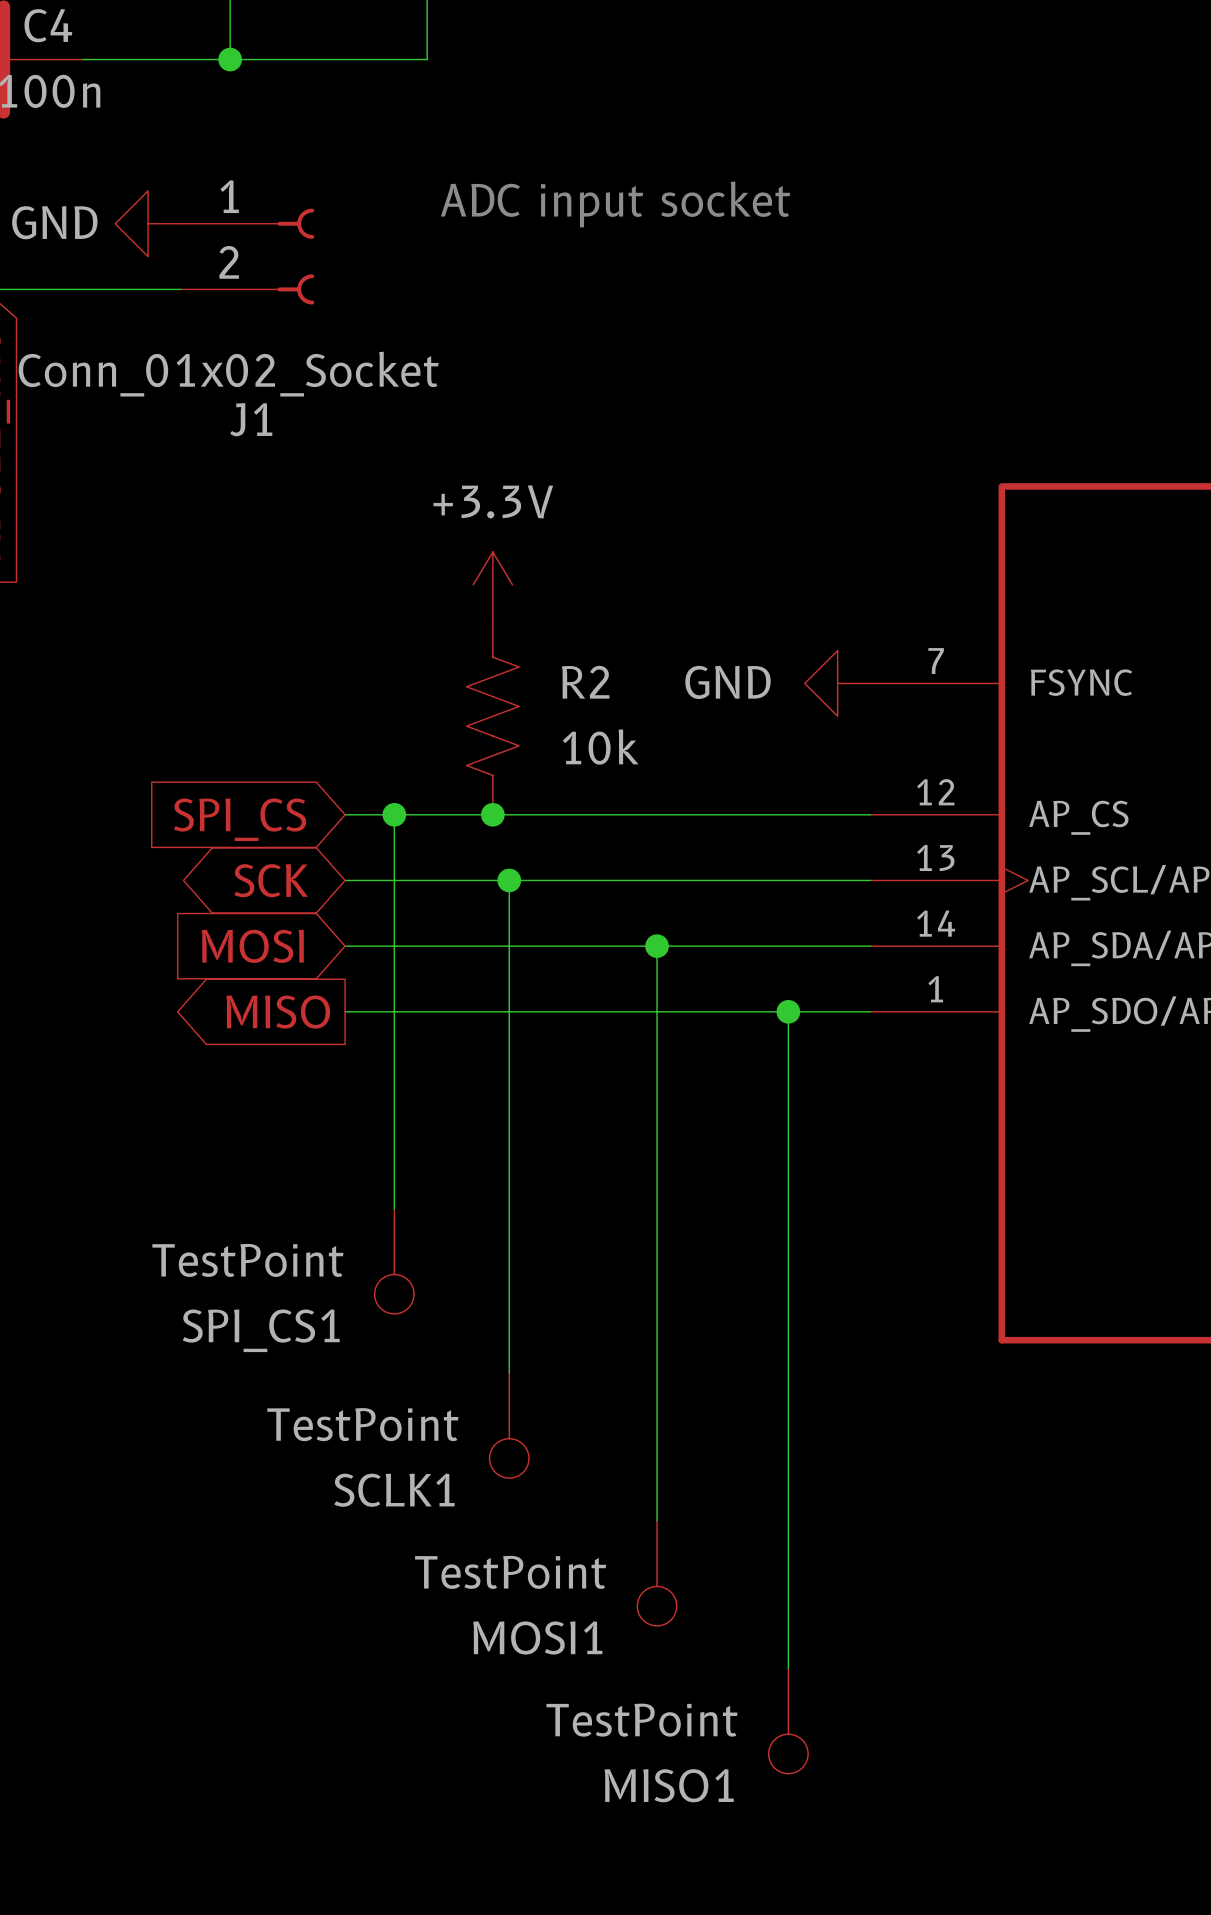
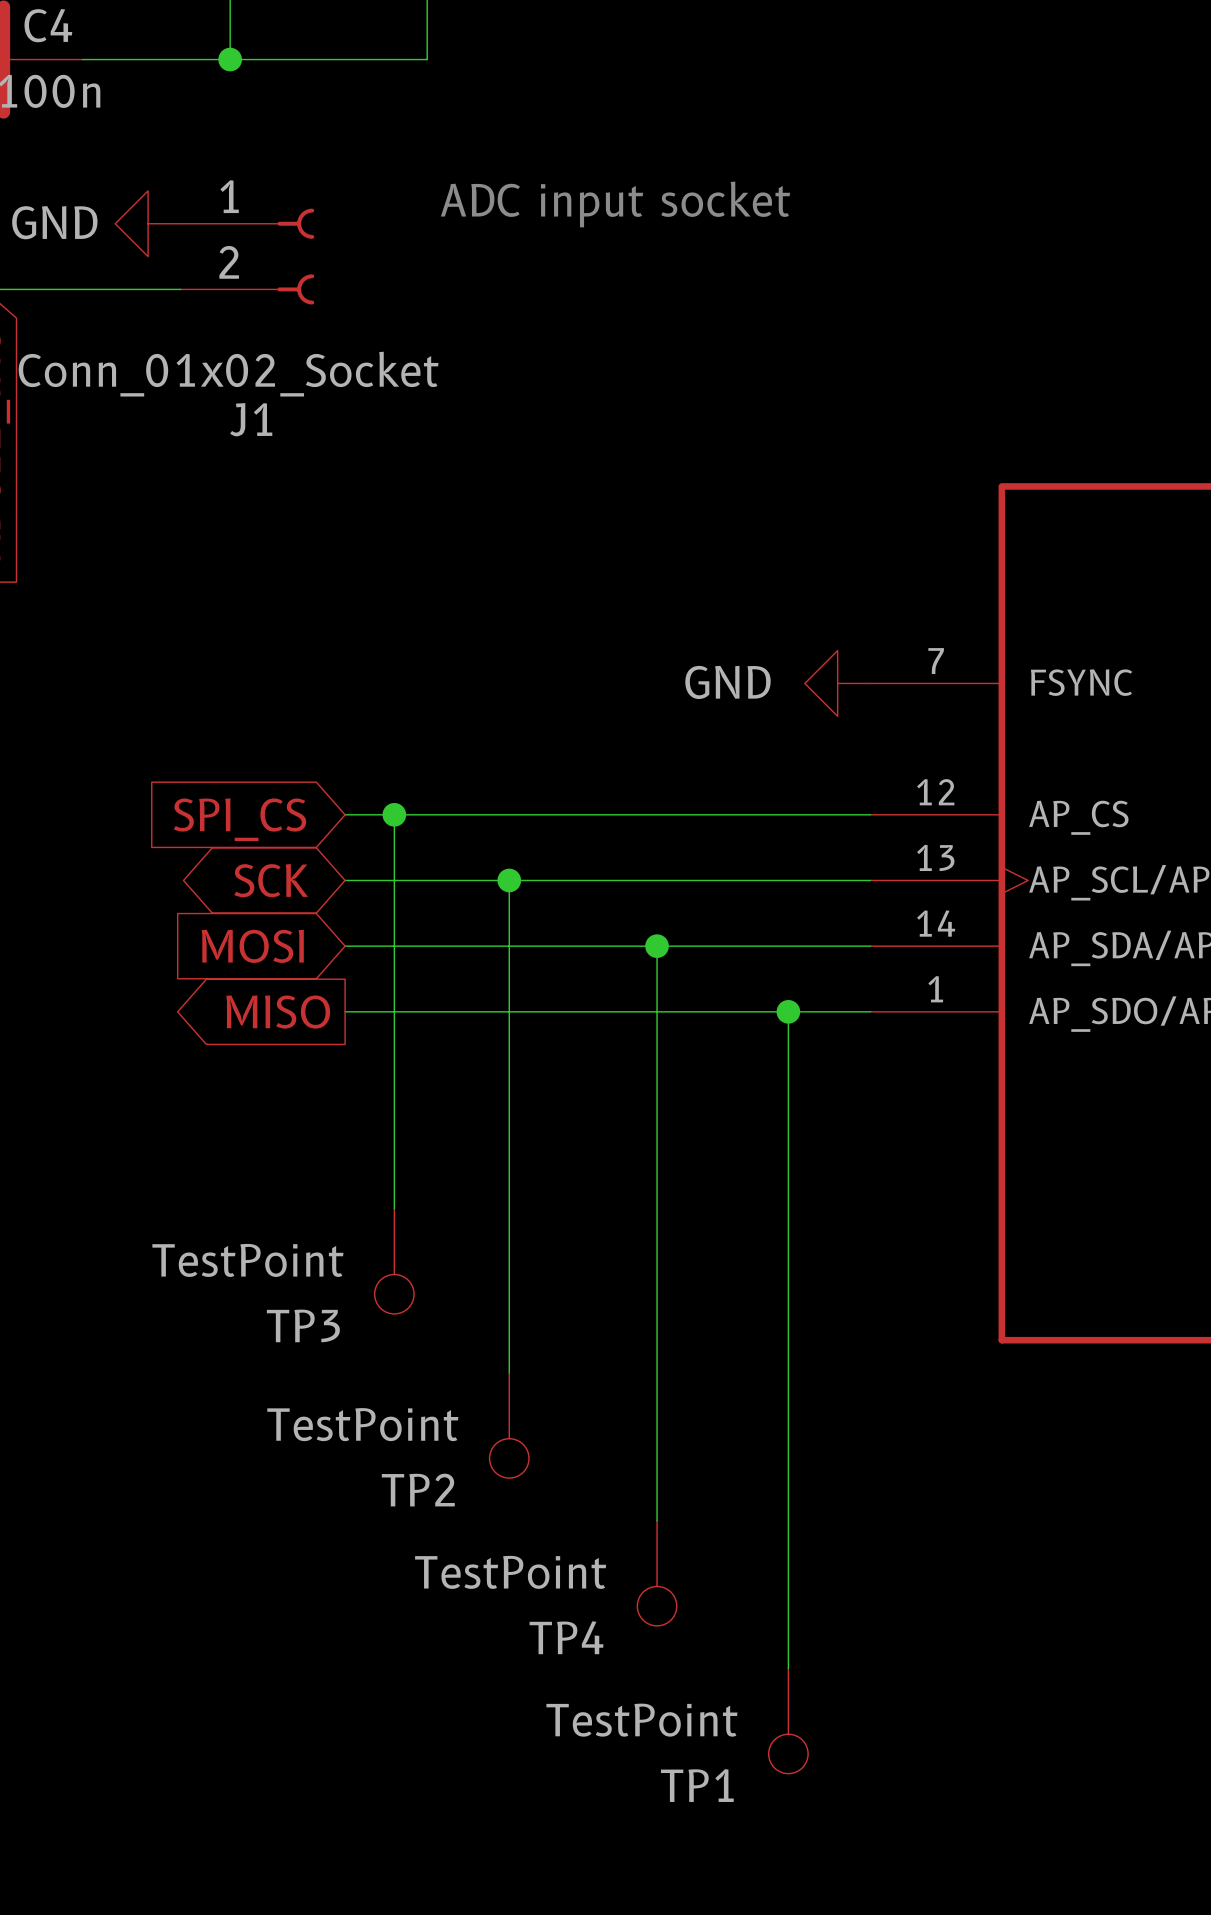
power symbol: +3.3V (492, 584) -> none
R2: 10k (492, 716) -> none
junction: (492, 814) -> none
SPI_CS1 name: SPI_CS1 (261, 1330) -> TP3 (303, 1325)
SCLK1 name: SCLK1 (394, 1490) -> TP2 (418, 1490)
MOSI1 name: MOSI1 (537, 1637) -> TP4 (566, 1637)
MISO1 name: MISO1 (669, 1785) -> TP1 (697, 1785)

